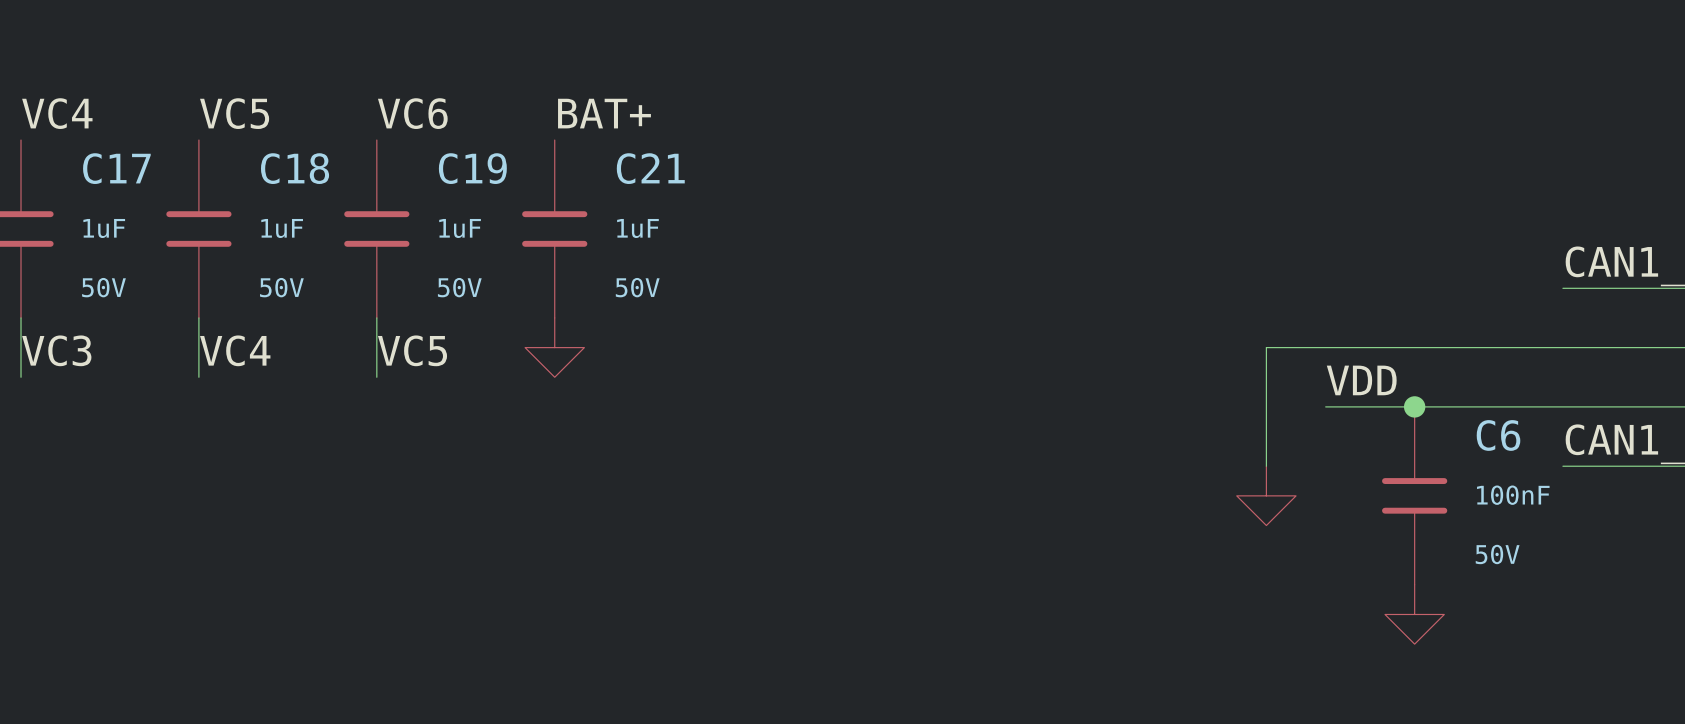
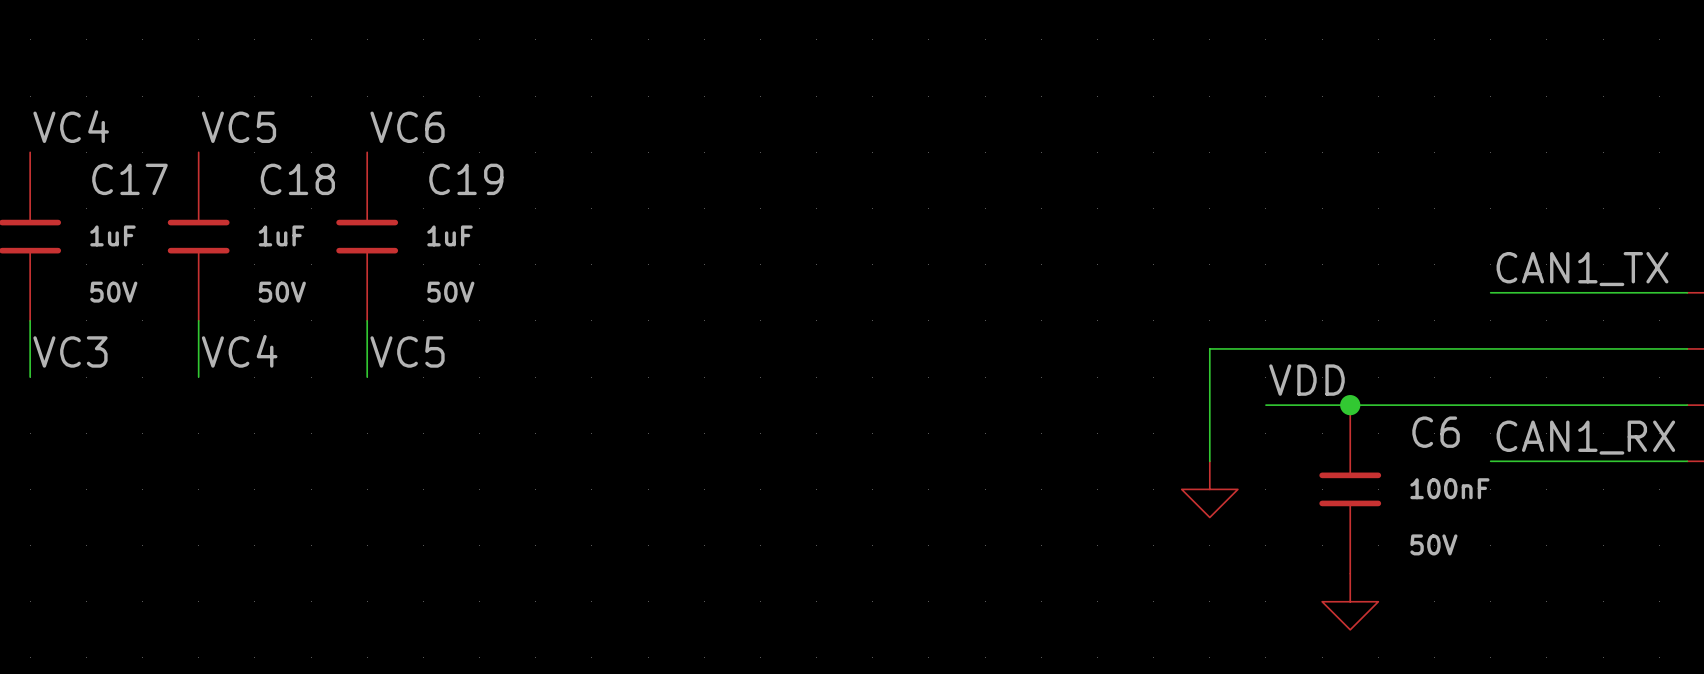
label: BAT+ (604, 113) -> none
C21: 1uF (554, 229) -> none
power symbol: (554, 347) -> none

